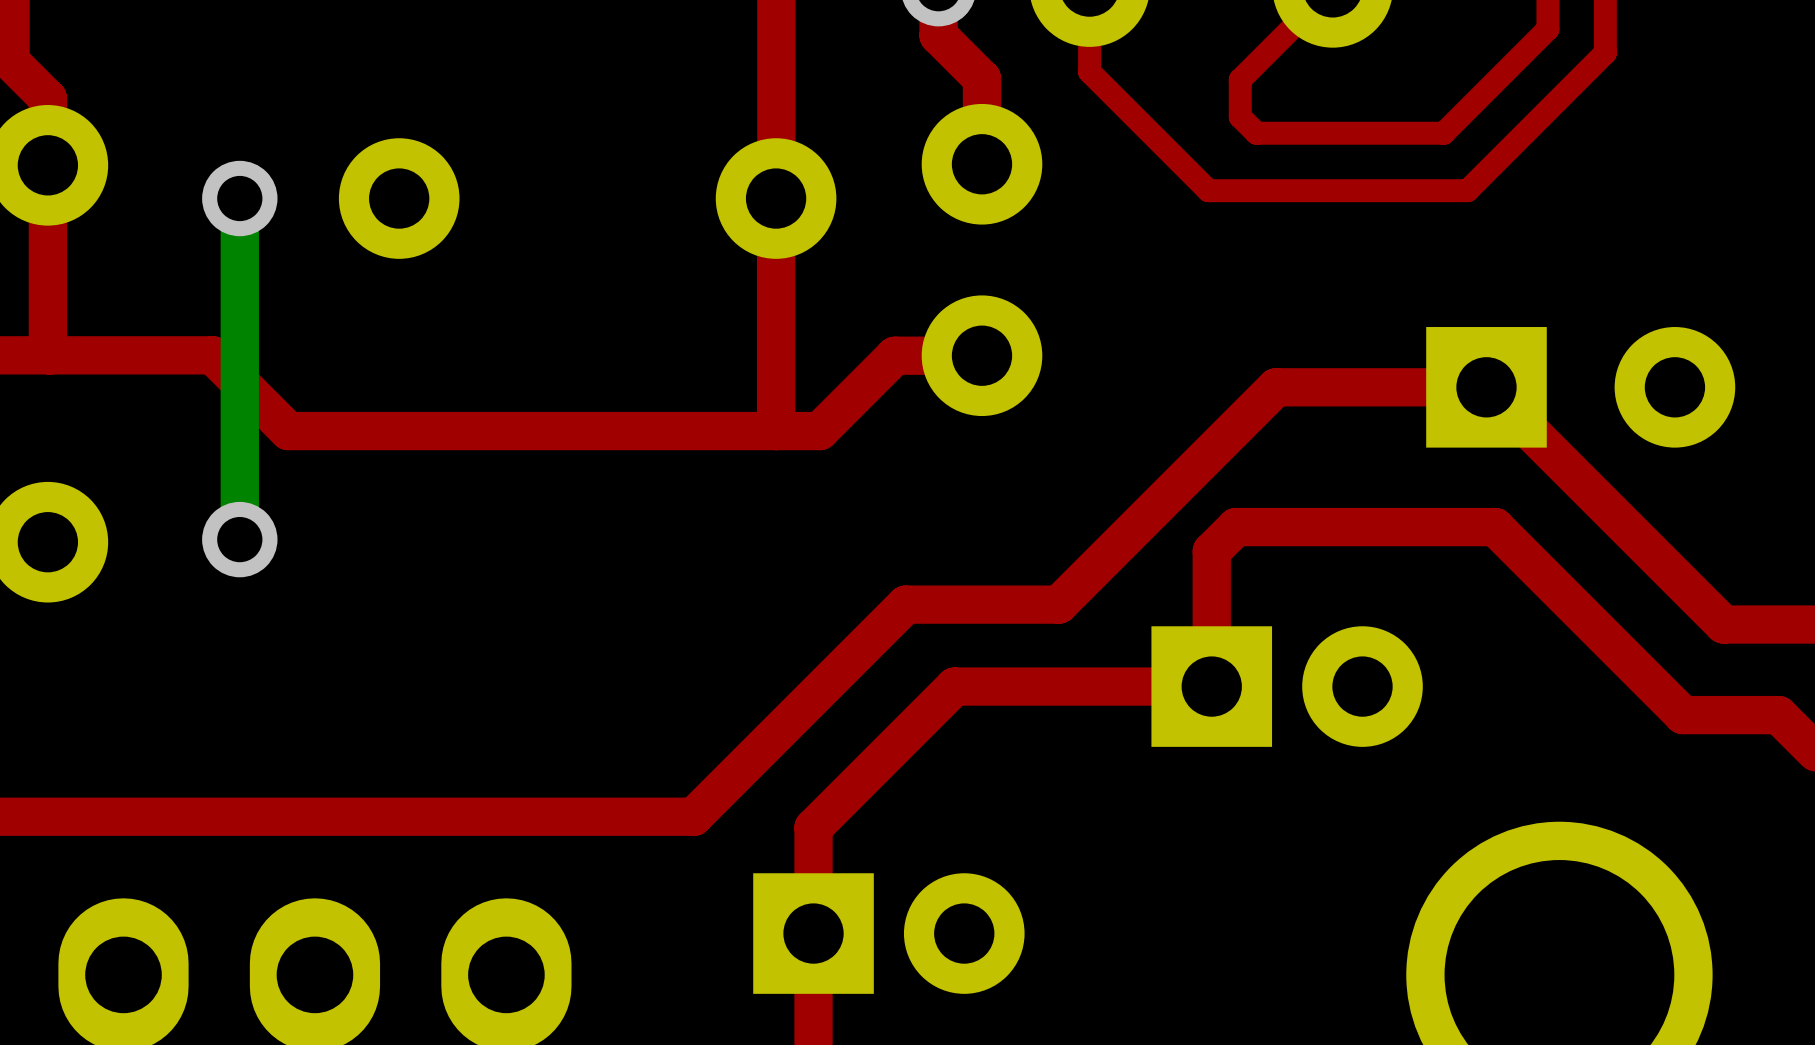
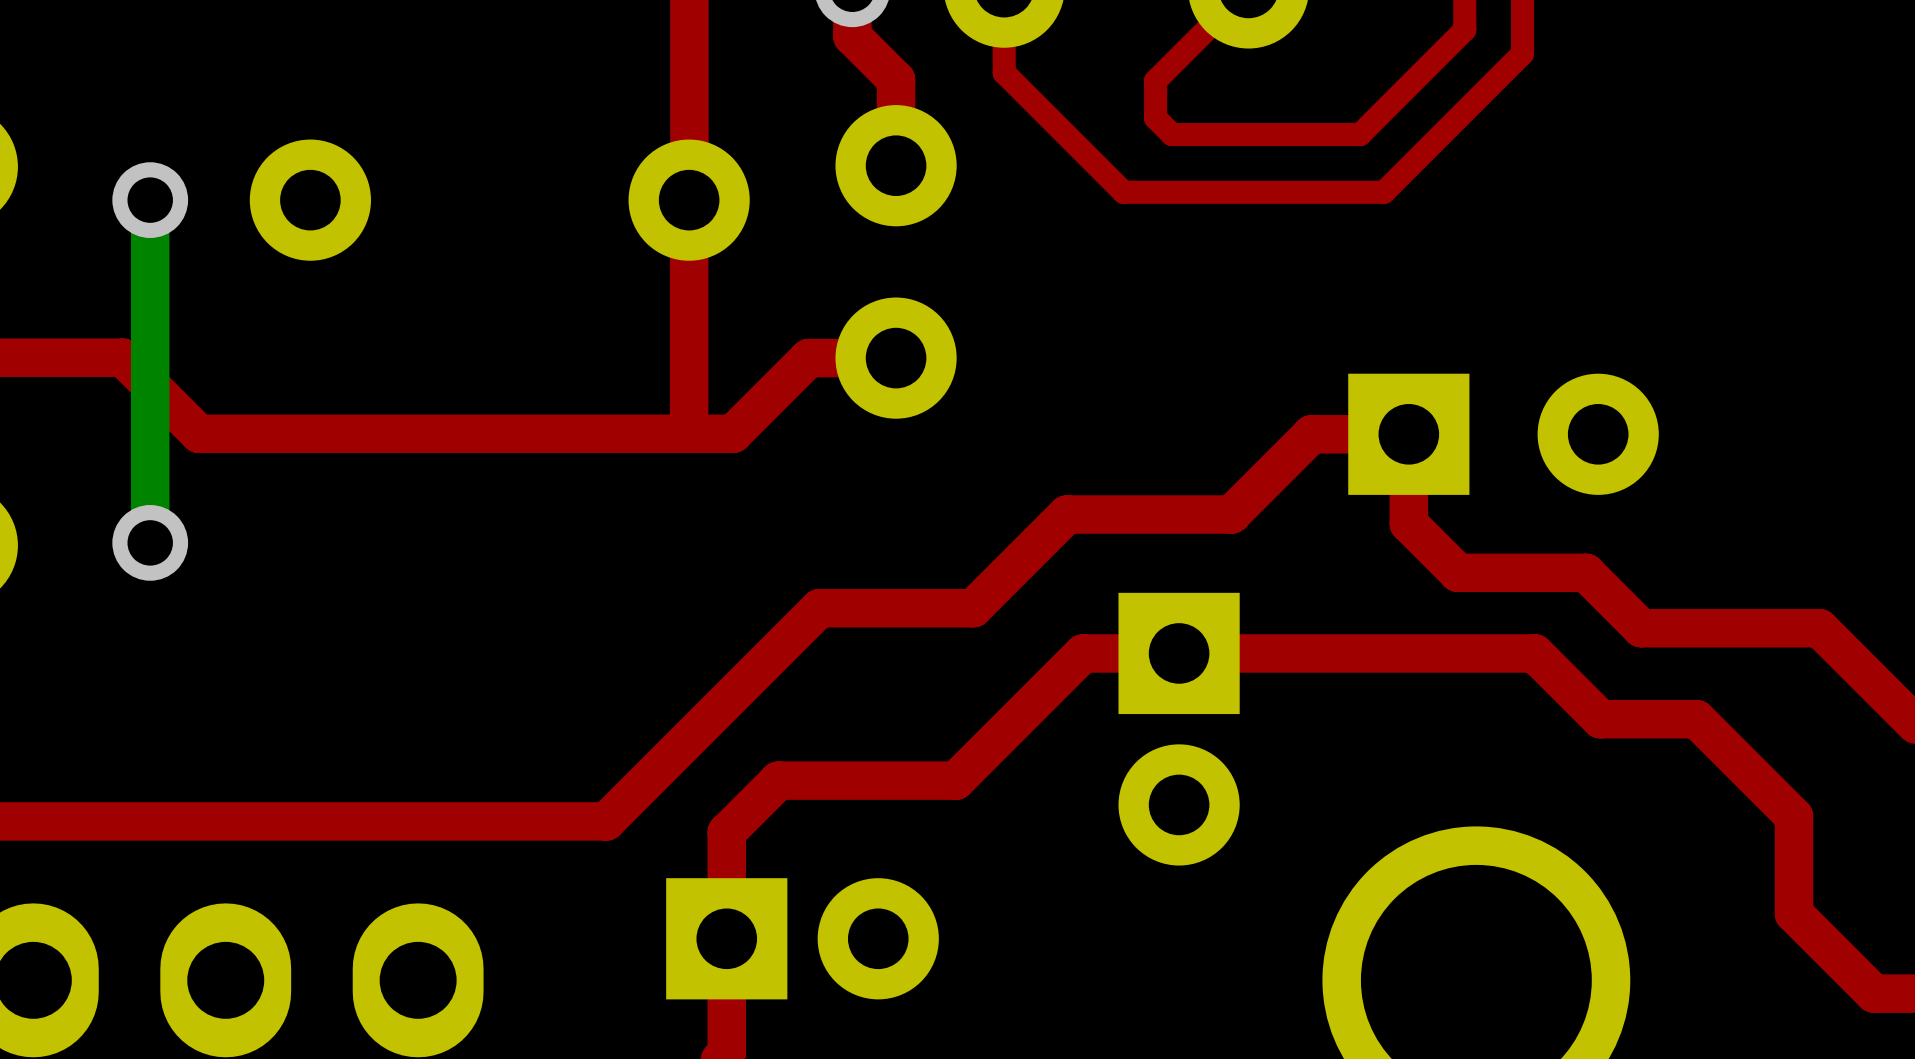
part position: (1580, 387) -> (1503, 434)
top track: (1152, 511) (1276, 387) (1486, 387) (1668, 569) -> (1066, 514) (1231, 514) (1311, 434) (1408, 434) (1408, 523) (1458, 572) (1586, 572)
top track: (1617, 649) (1495, 527) (1236, 527) (1211, 551) (1211, 686) (954, 686) (865, 776) -> (1534, 653) (1083, 653) (955, 780) (778, 780)
part rotation: 0° (1287, 686) -> 90° clockwise (1179, 729)

